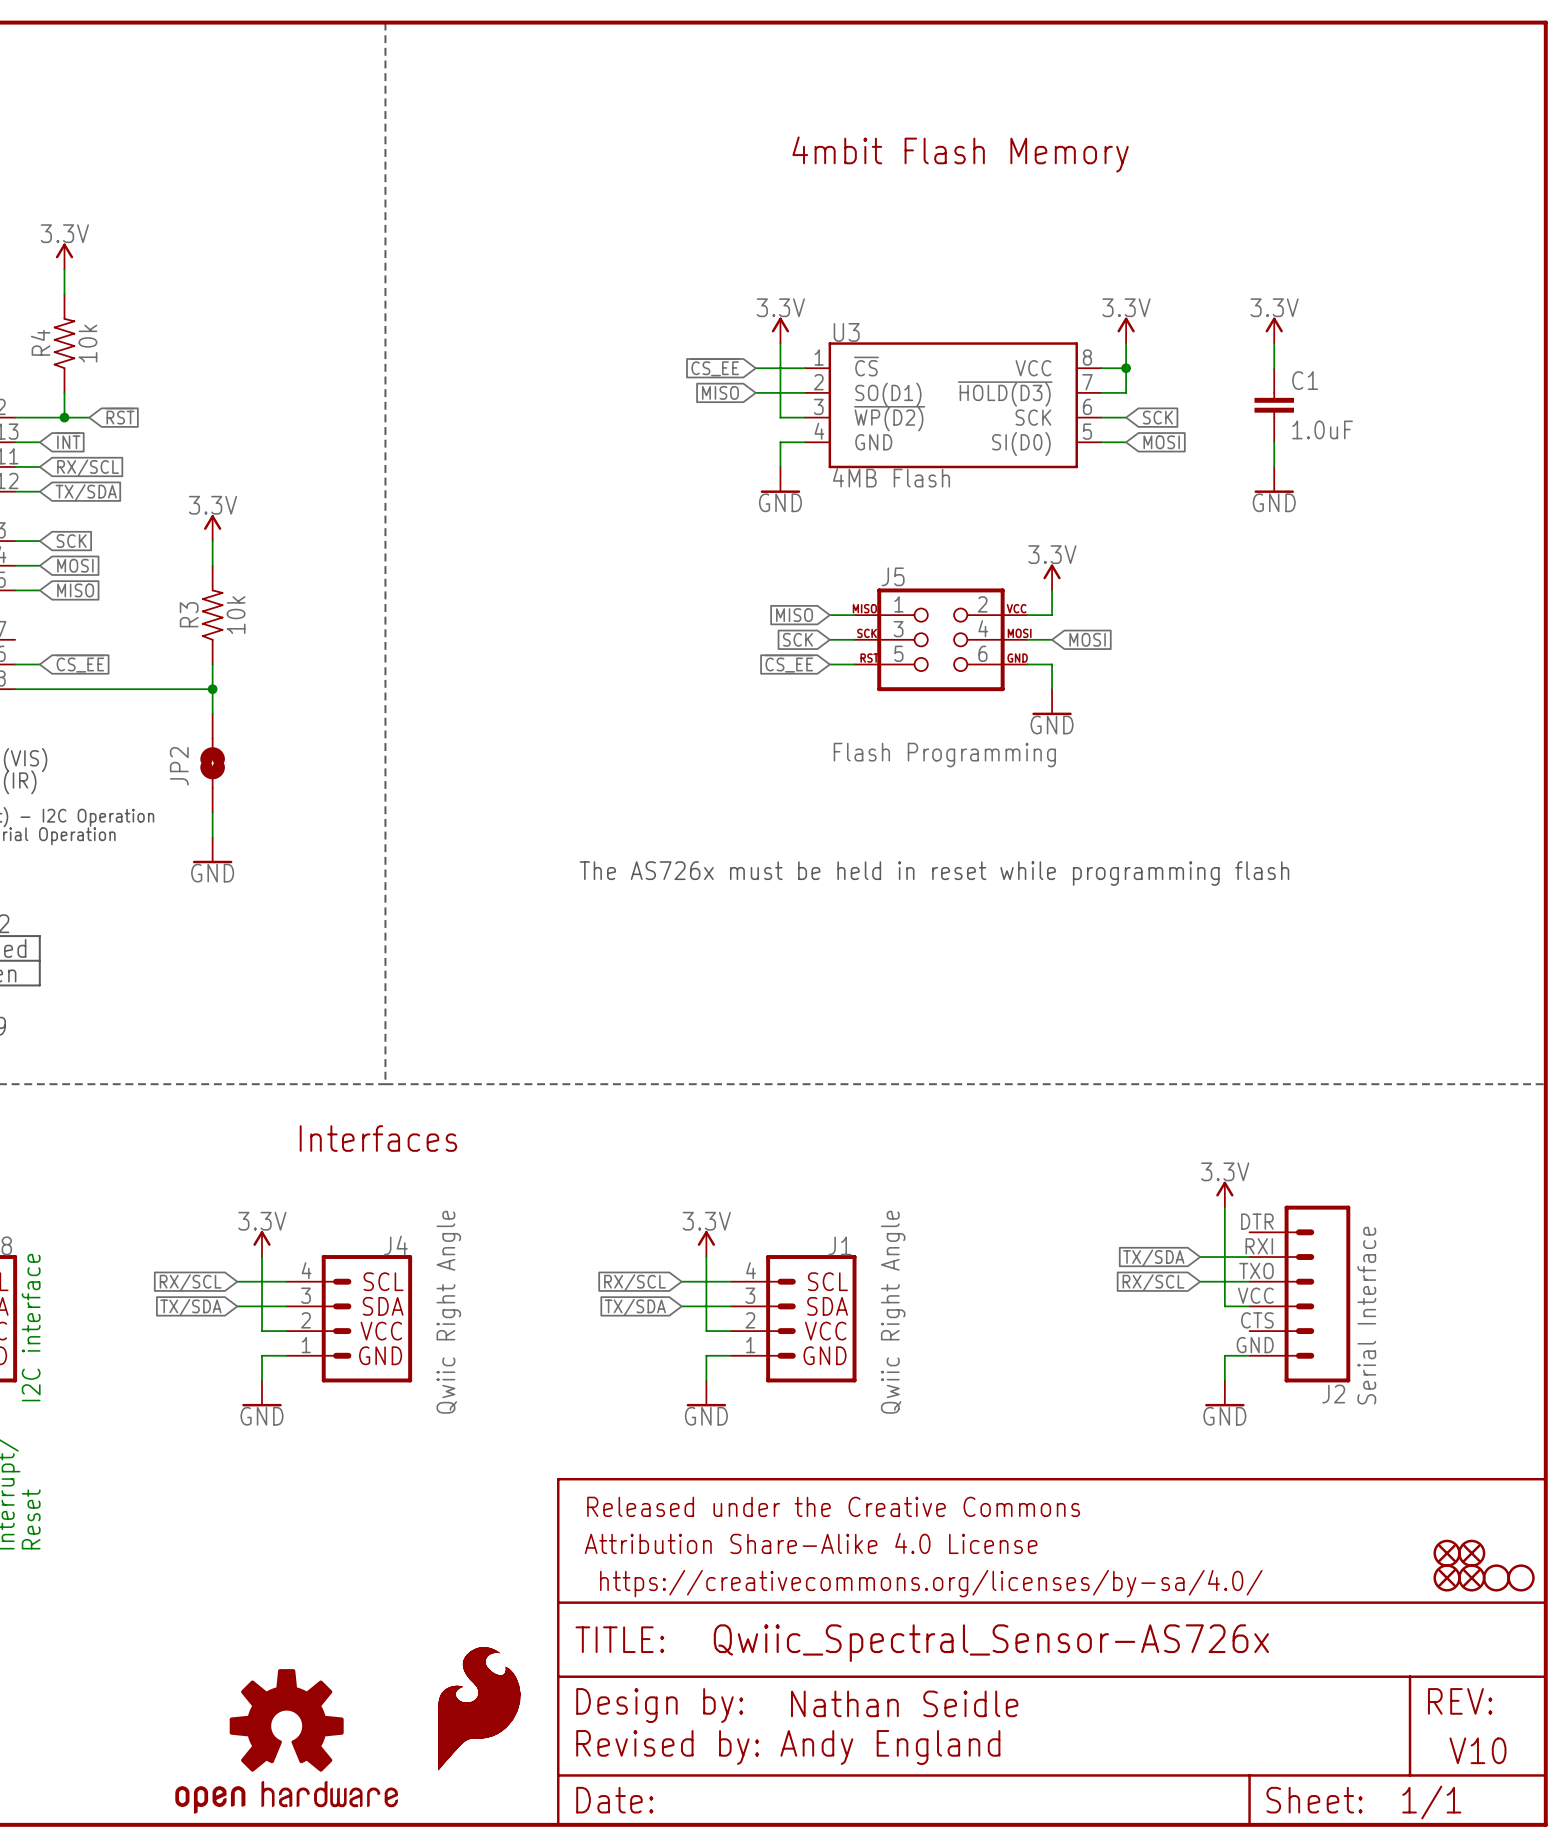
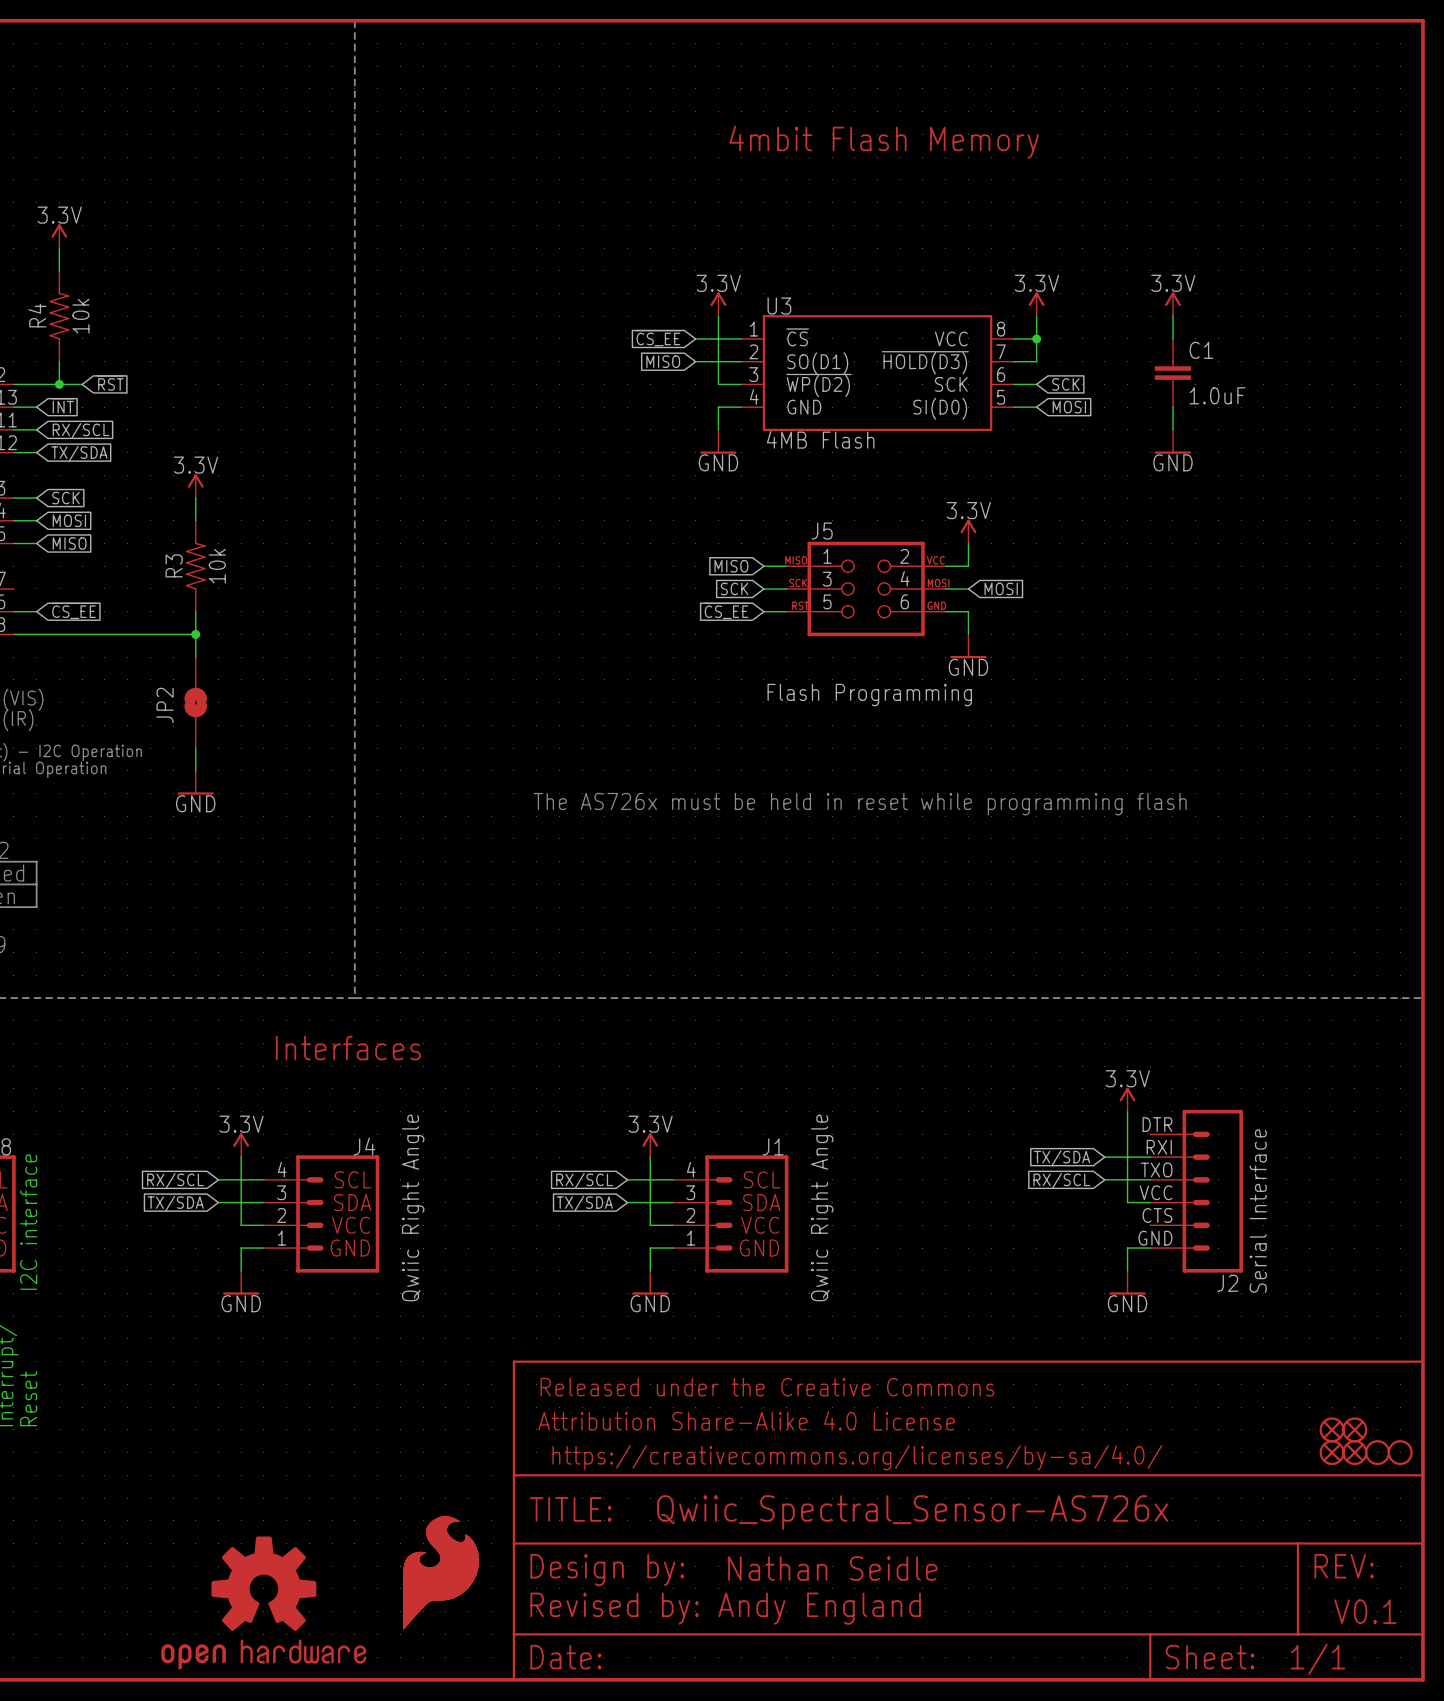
text: V10 (1477, 1750) -> V0.1 (1365, 1611)

